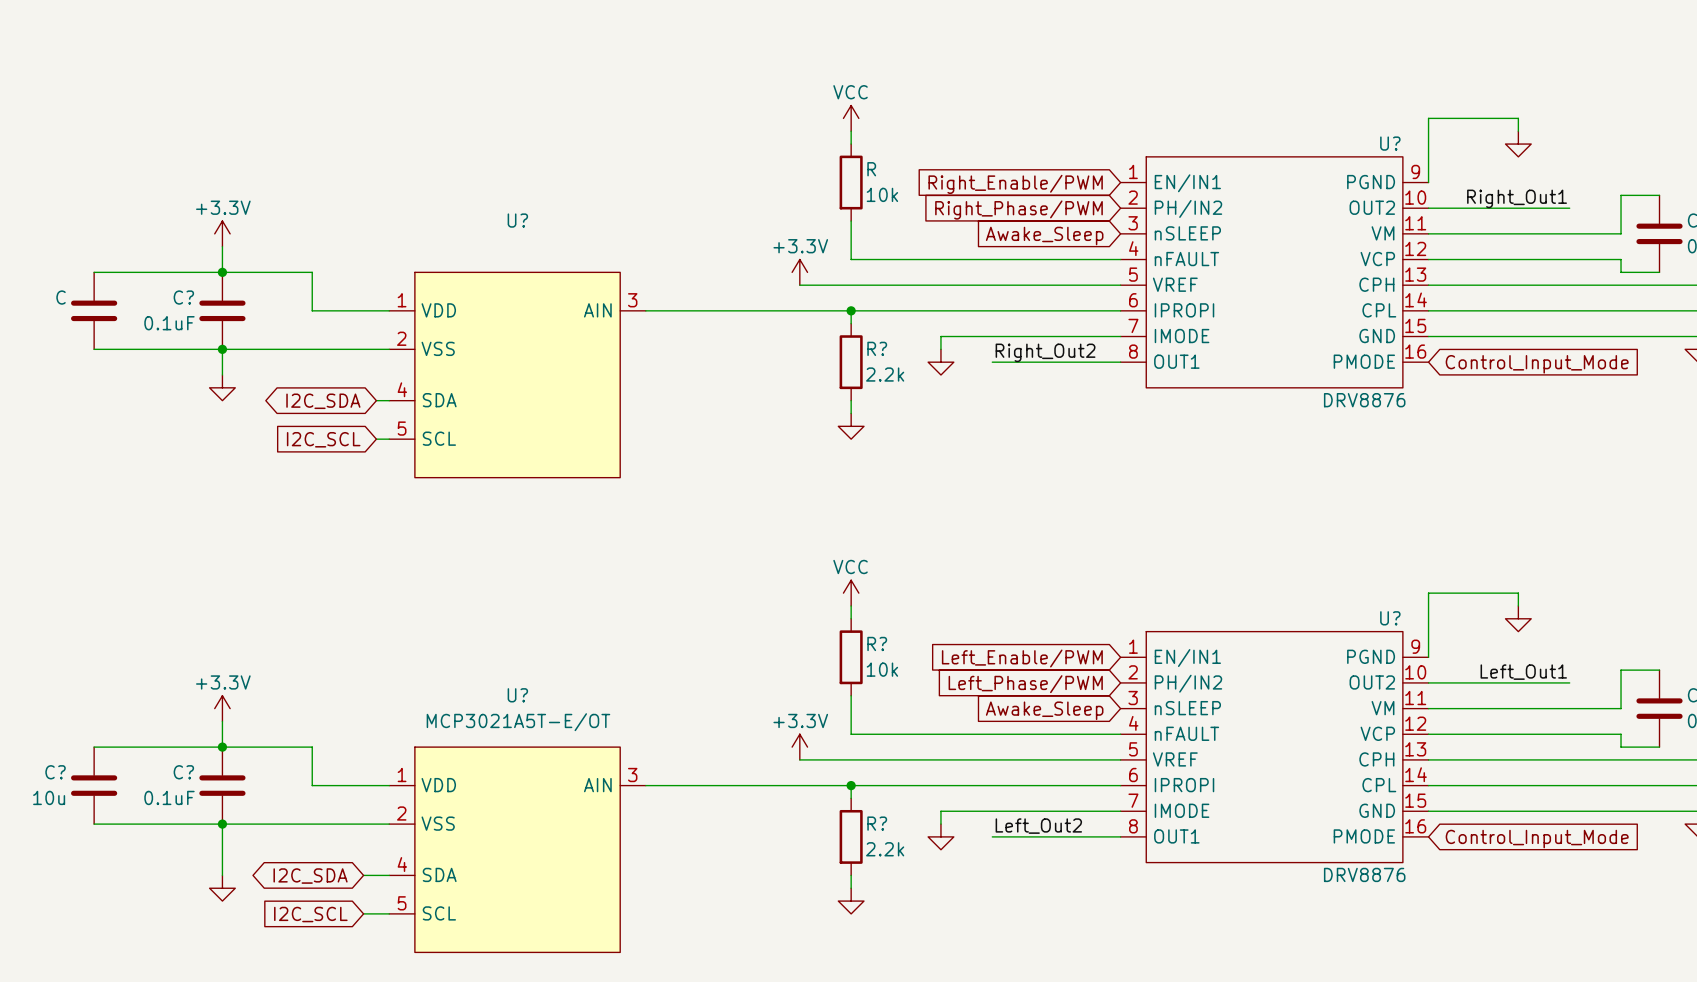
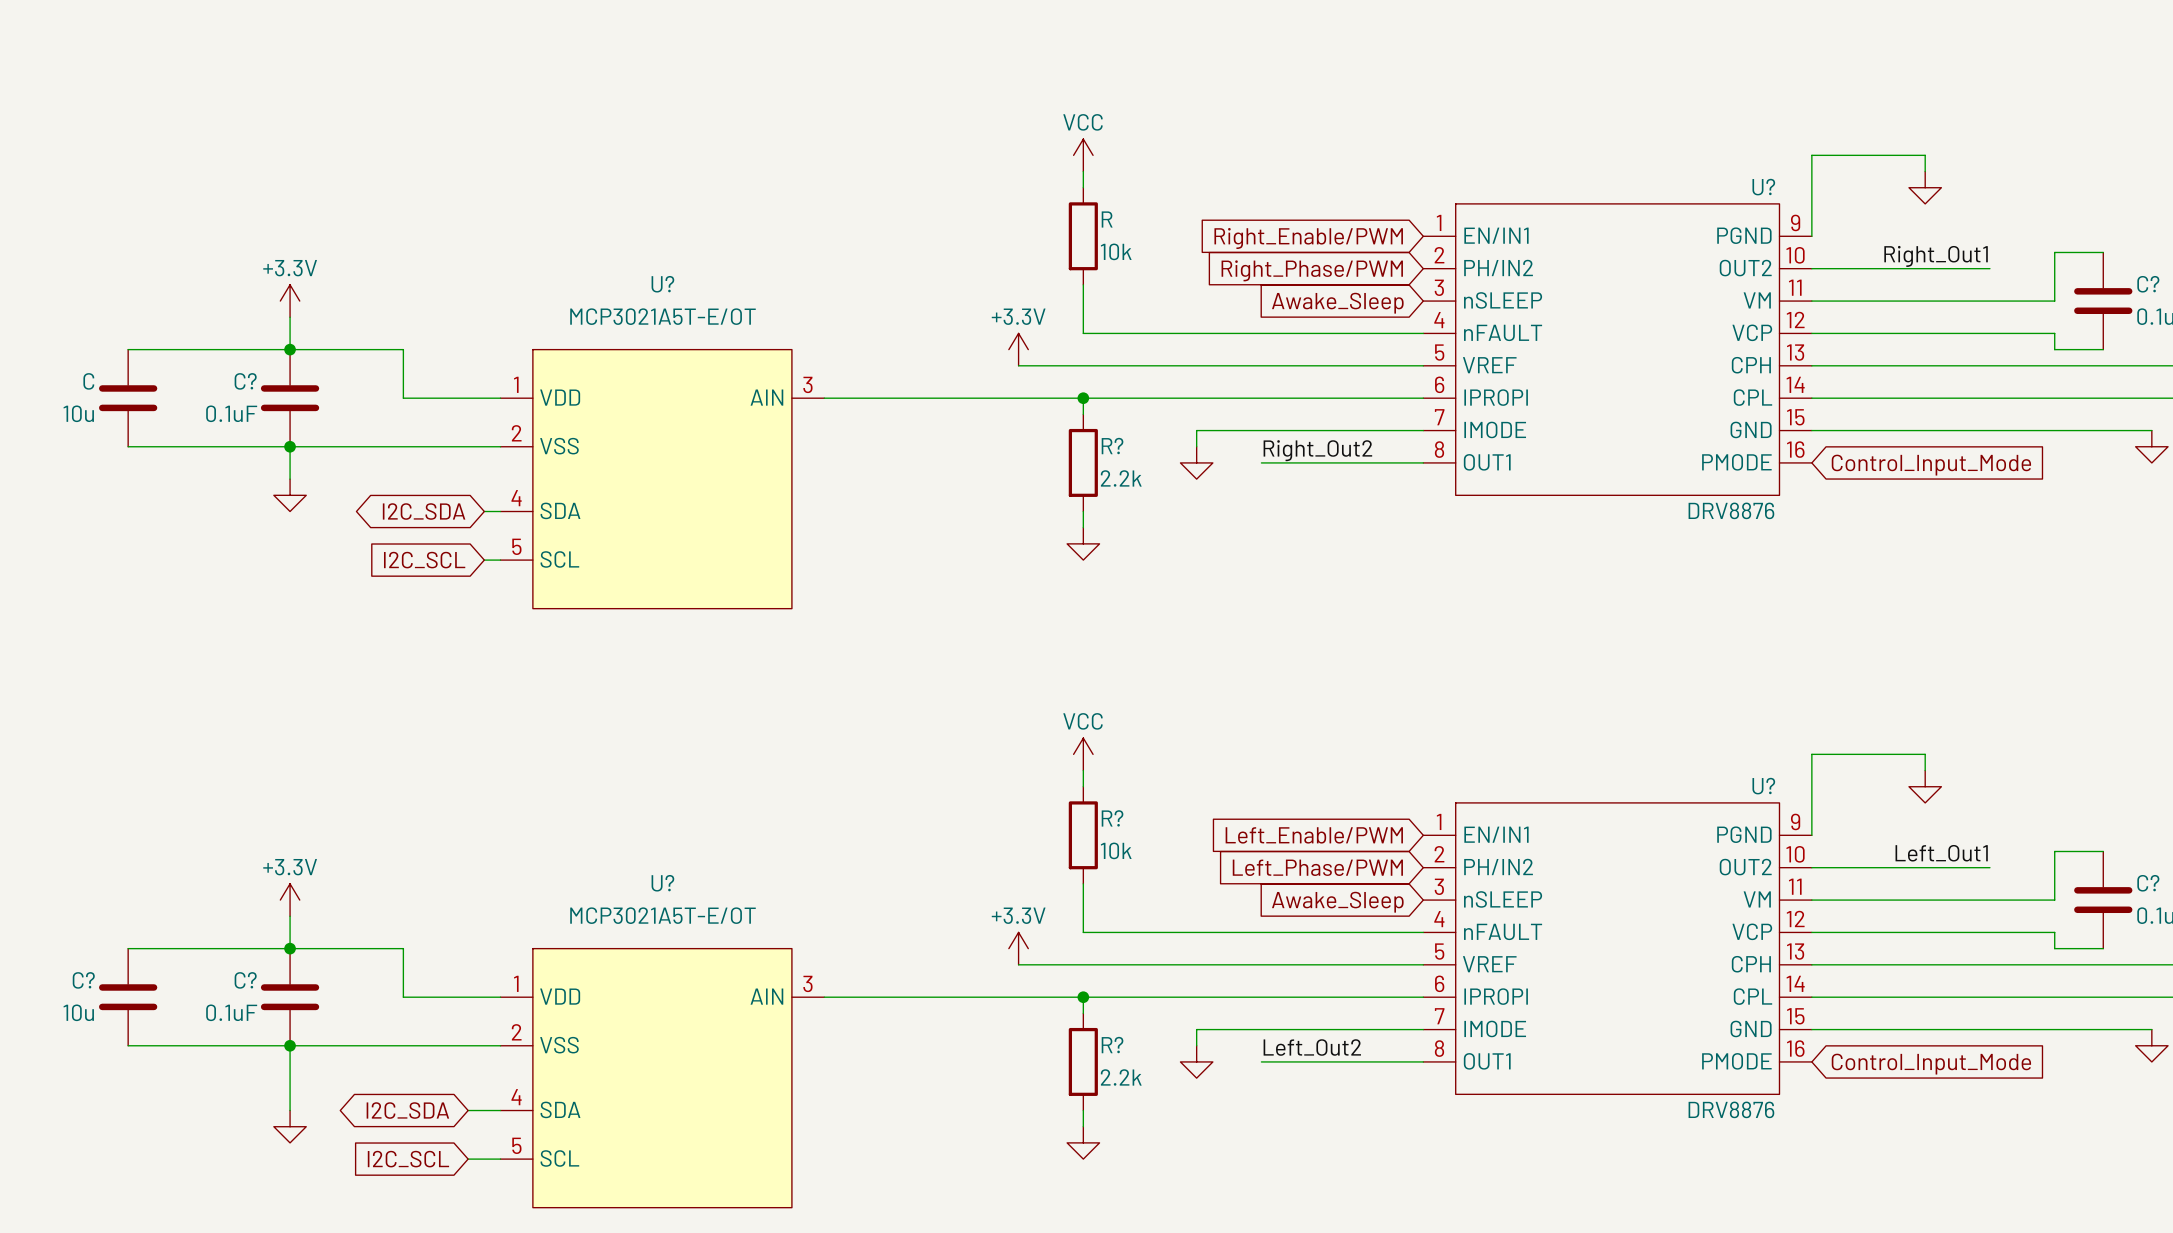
U? value: none -> MCP3021A5T-E/OT (663, 316)
C value: none -> 10u (78, 413)

